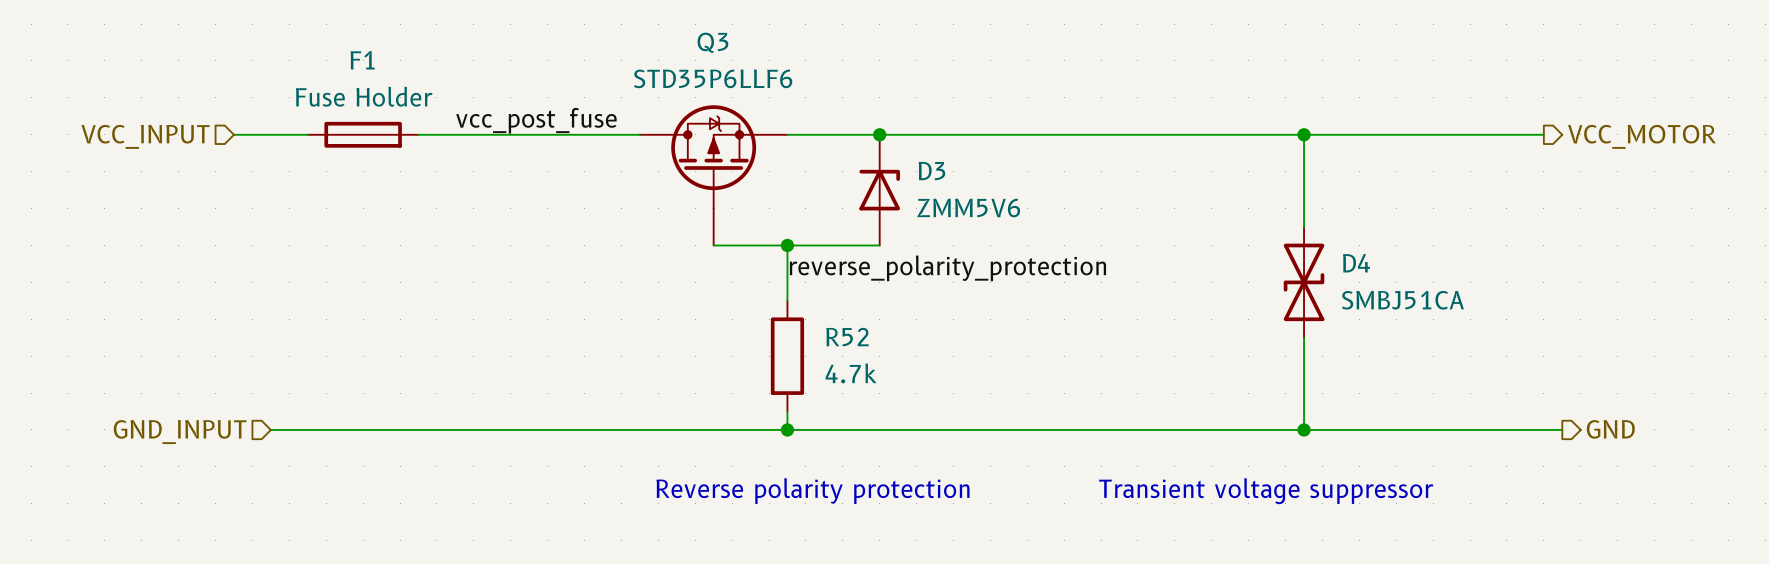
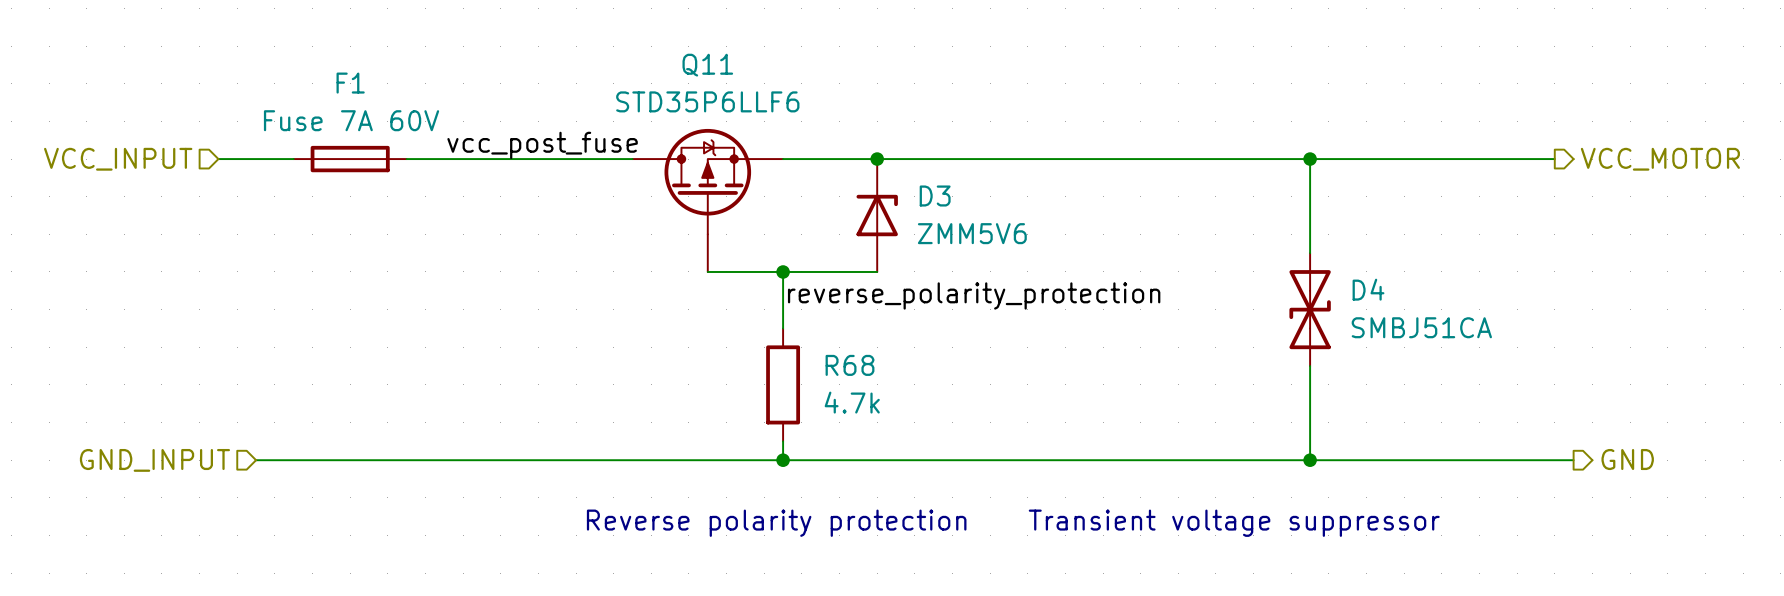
Q3 name: Q3 (712, 42) -> Q11 (707, 65)
F1 value: Fuse Holder (364, 96) -> Fuse 7A 60V (351, 120)
R52 name: R52 (847, 337) -> R68 (850, 365)

